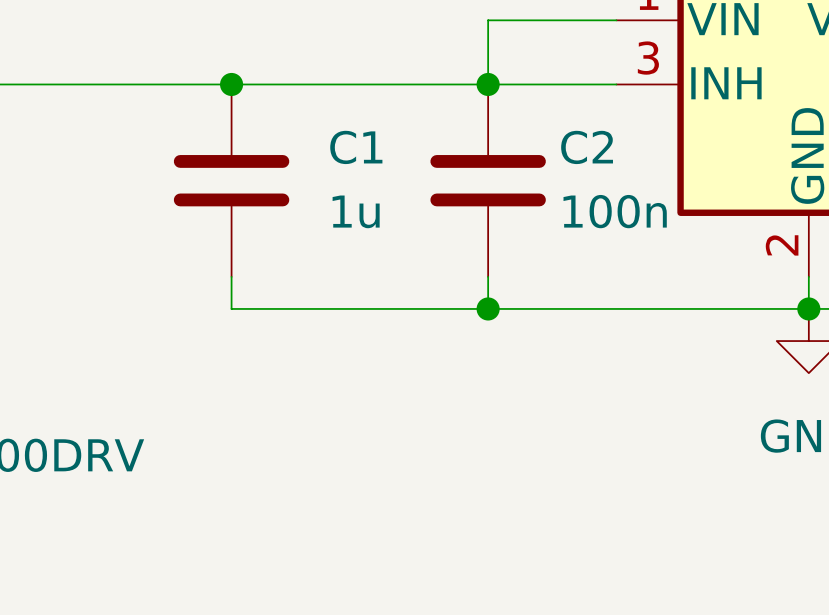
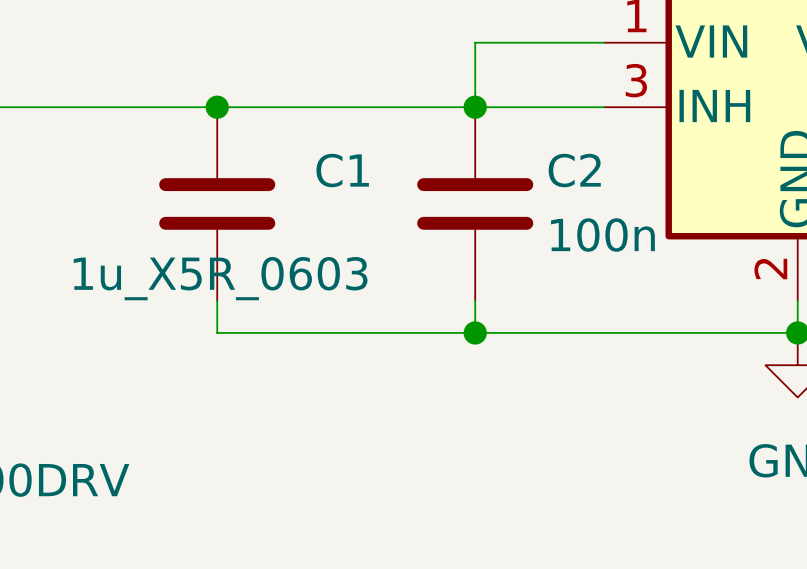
C1 value: 1u (356, 211) -> 1u_X5R_0603 (220, 278)

